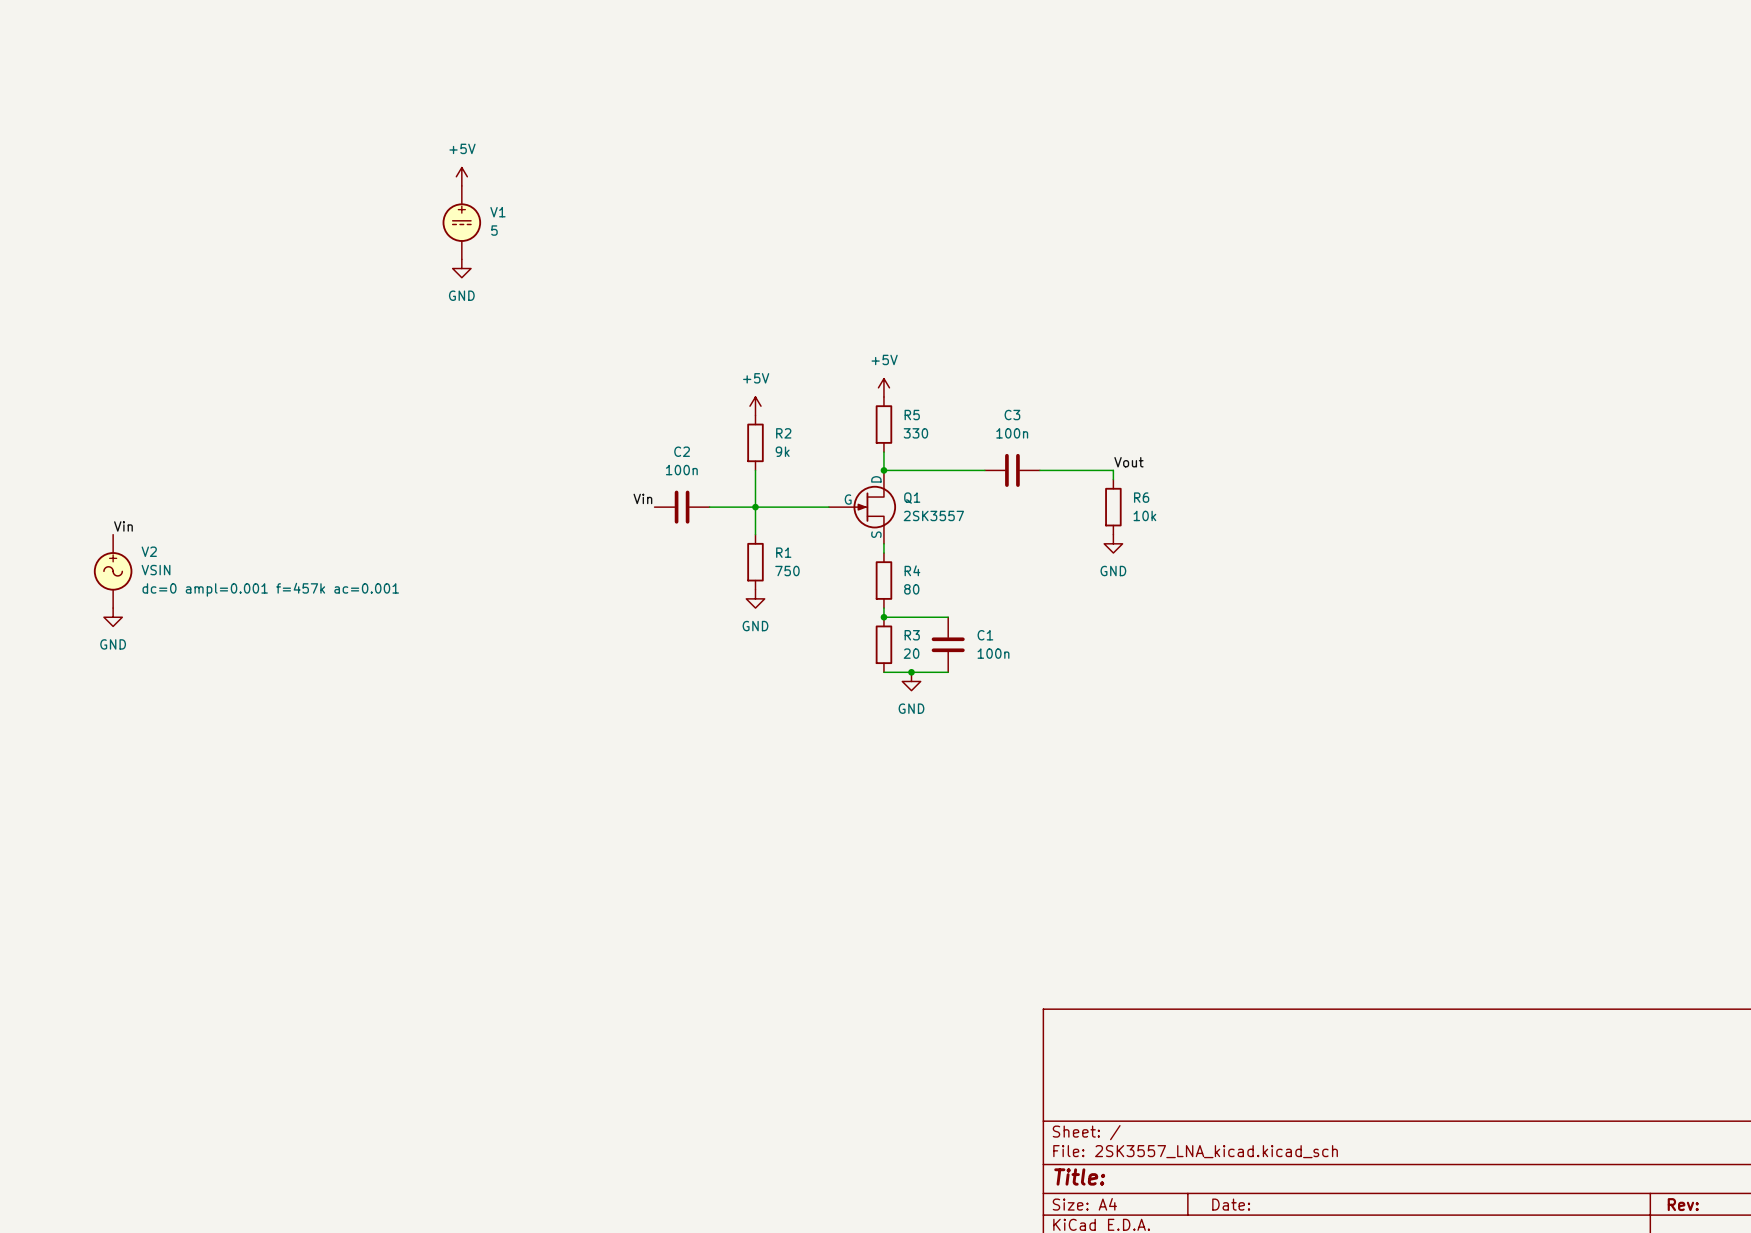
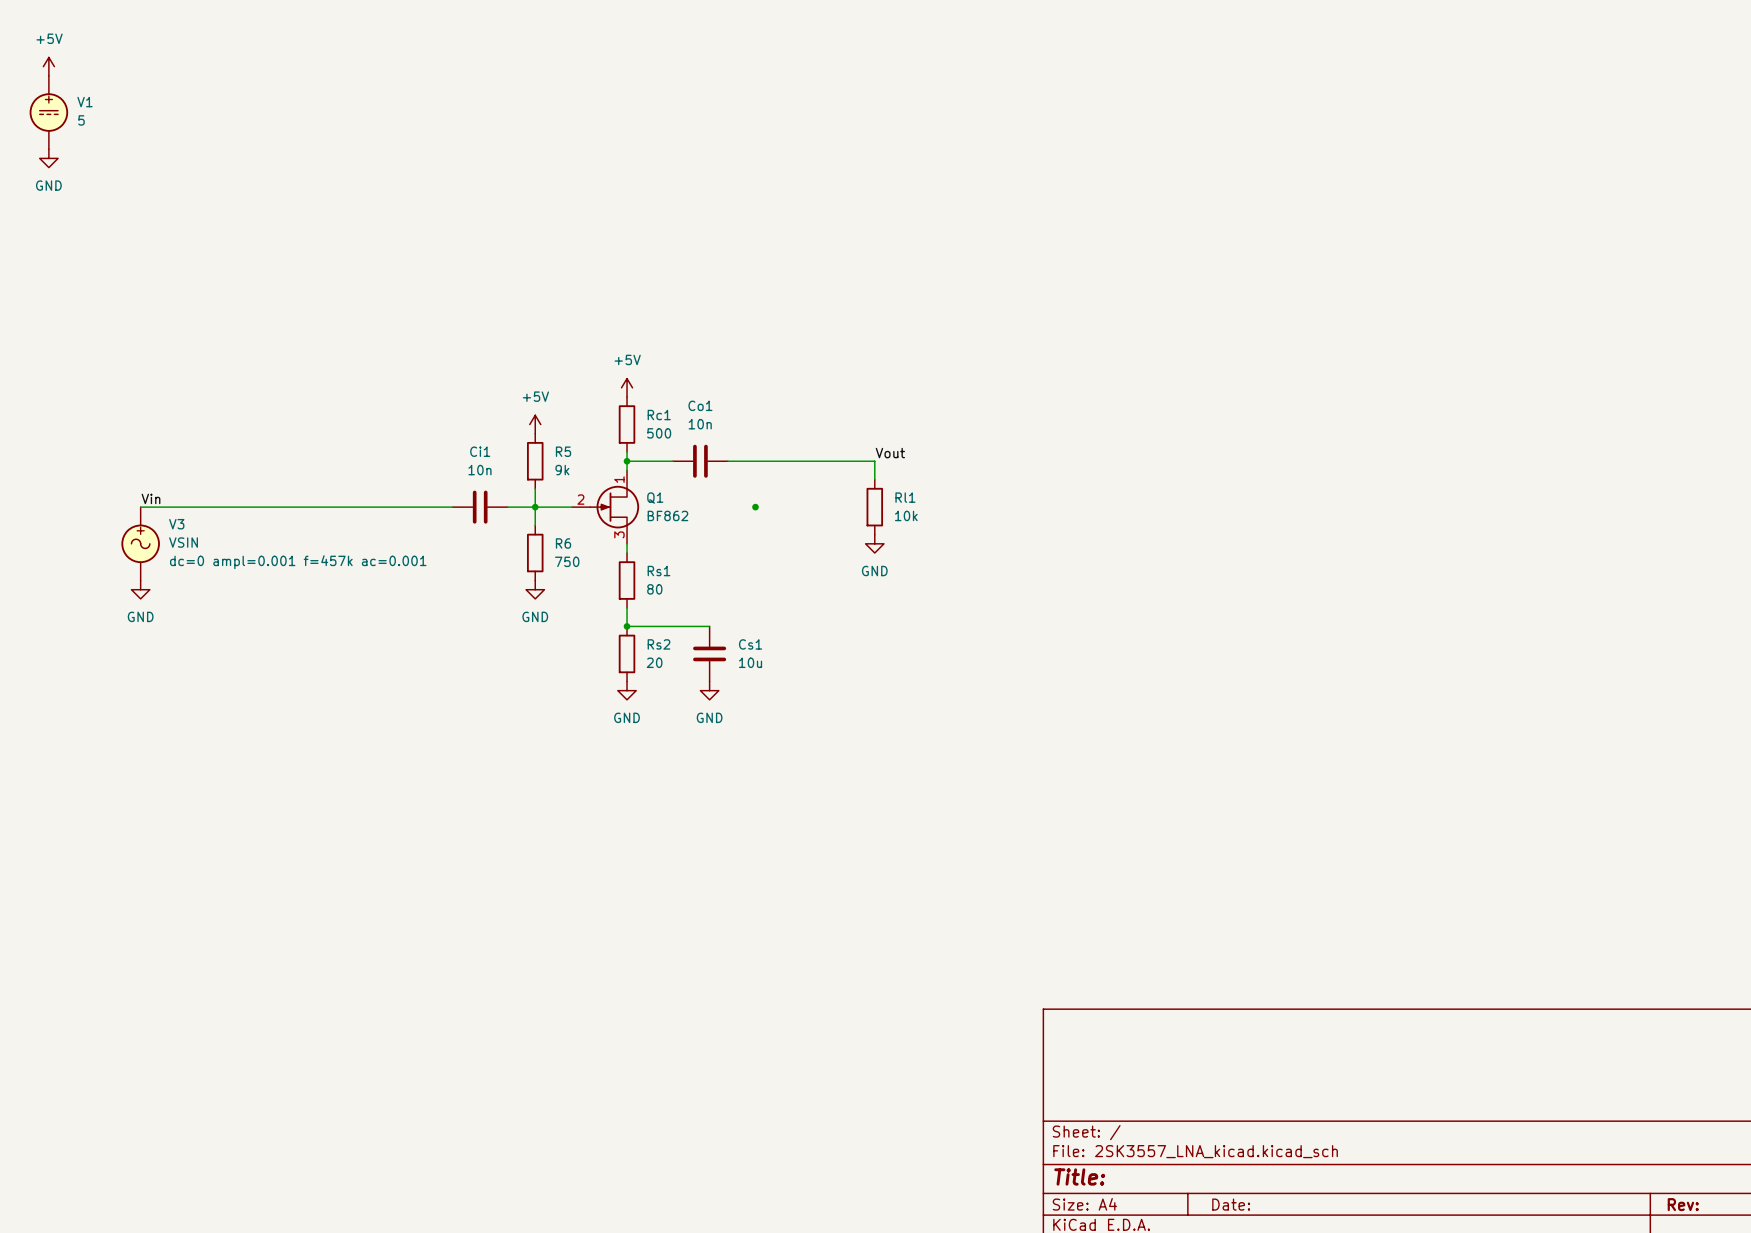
power symbol: none -> +5V (48, 66)
power symbol: none -> GND (48, 158)
power symbol: +5V (461, 176) -> none
V1 position: (461, 222) -> (48, 112)
power symbol: GND (461, 268) -> none
power symbol: none -> +5V (627, 387)
power symbol: +5V (883, 387) -> none
power symbol: +5V (755, 406) -> none
power symbol: none -> +5V (535, 424)
Rc1: none -> 500 (627, 424)
R5 position: (883, 424) -> (535, 461)
R5 value: 330 (915, 433) -> 9k (562, 470)
R2: 9k (755, 442) -> none
wire: none -> (627, 452) (627, 470)
wire: (883, 452) (883, 470) (984, 470) -> none
label: none -> Vout (890, 453)
wire: none -> (627, 461) (672, 461)
junction: none -> (627, 461)
Co1: none -> 10n (700, 461)
wire: none -> (727, 461) (874, 461) (874, 479)
label: Vout (1128, 462) -> none
wire: (755, 470) (755, 534) -> none
Q1 symbol: [828, 470, 897, 544] -> [571, 470, 640, 544]
junction: (883, 470) -> none
C3: 100n (1012, 470) -> none
wire: (1039, 470) (1113, 470) (1113, 479) -> none
wire: none -> (535, 488) (535, 525)
label: Vin (642, 498) -> none
wire: none -> (140, 507) (452, 507)
Ci1: none -> 10n (480, 507)
wire: none -> (507, 507) (571, 507)
junction: none -> (535, 507)
C2: 100n (682, 507) -> none
wire: (709, 507) (828, 507) -> none
Rl1: none -> 10k (874, 507)
R6 position: (1113, 507) -> (535, 553)
Q1 value: 2SK3557 (933, 515) -> BF862 (667, 515)
R6 value: 10k (1144, 515) -> 750 (567, 561)
label position: Vin (123, 526) -> Vin (150, 498)
V3: none -> VSIN (140, 543)
wire: none -> (627, 543) (627, 553)
power symbol: none -> GND (874, 543)
wire: (883, 543) (883, 553) -> none
power symbol: GND (1113, 543) -> none
R1: 750 (755, 562) -> none
V2: VSIN (113, 571) -> none
Rs1: none -> 80 (627, 580)
R4: 80 (883, 580) -> none
power symbol: none -> GND (535, 589)
power symbol: GND (755, 598) -> none
wire: none -> (627, 608) (627, 626) (709, 626)
wire: (883, 608) (883, 617) (948, 617) -> none
power symbol position: GND (113, 617) -> GND (140, 589)
junction: (883, 617) -> none
junction: none -> (627, 626)
R3: 20 (883, 644) -> none
C1: 100n (948, 644) -> none
Rs2: none -> 20 (627, 653)
Cs1: none -> 10u (709, 653)
wire: (883, 672) (948, 672) -> none
junction: (911, 672) -> none
power symbol: GND (911, 681) -> none
power symbol: none -> GND (627, 690)
power symbol: none -> GND (709, 690)

